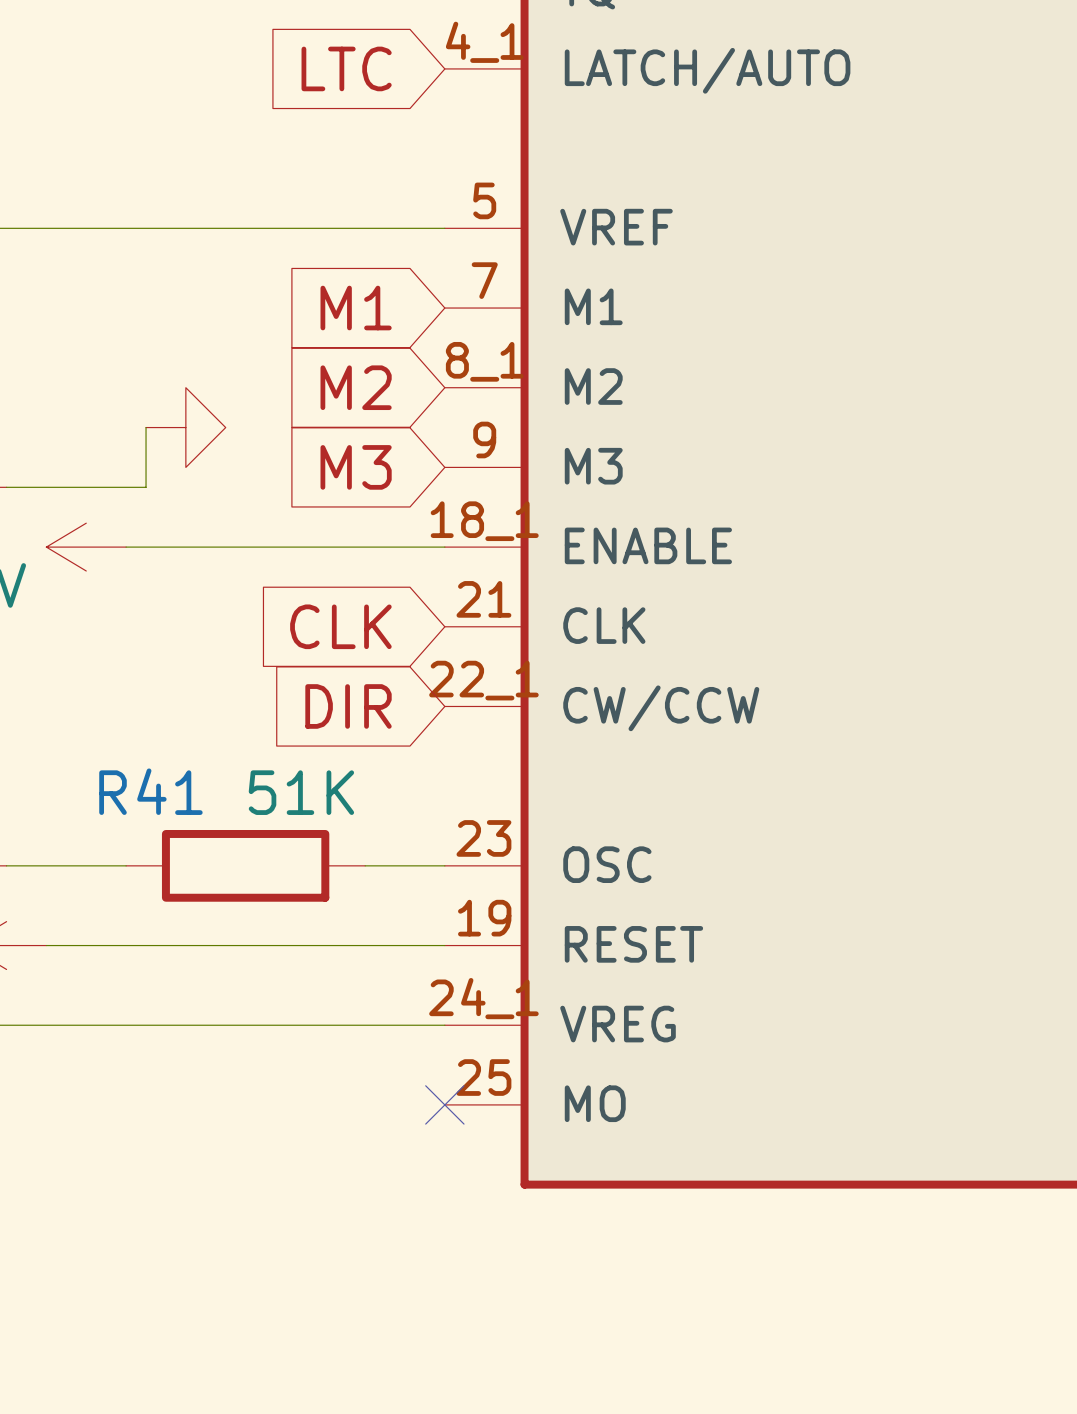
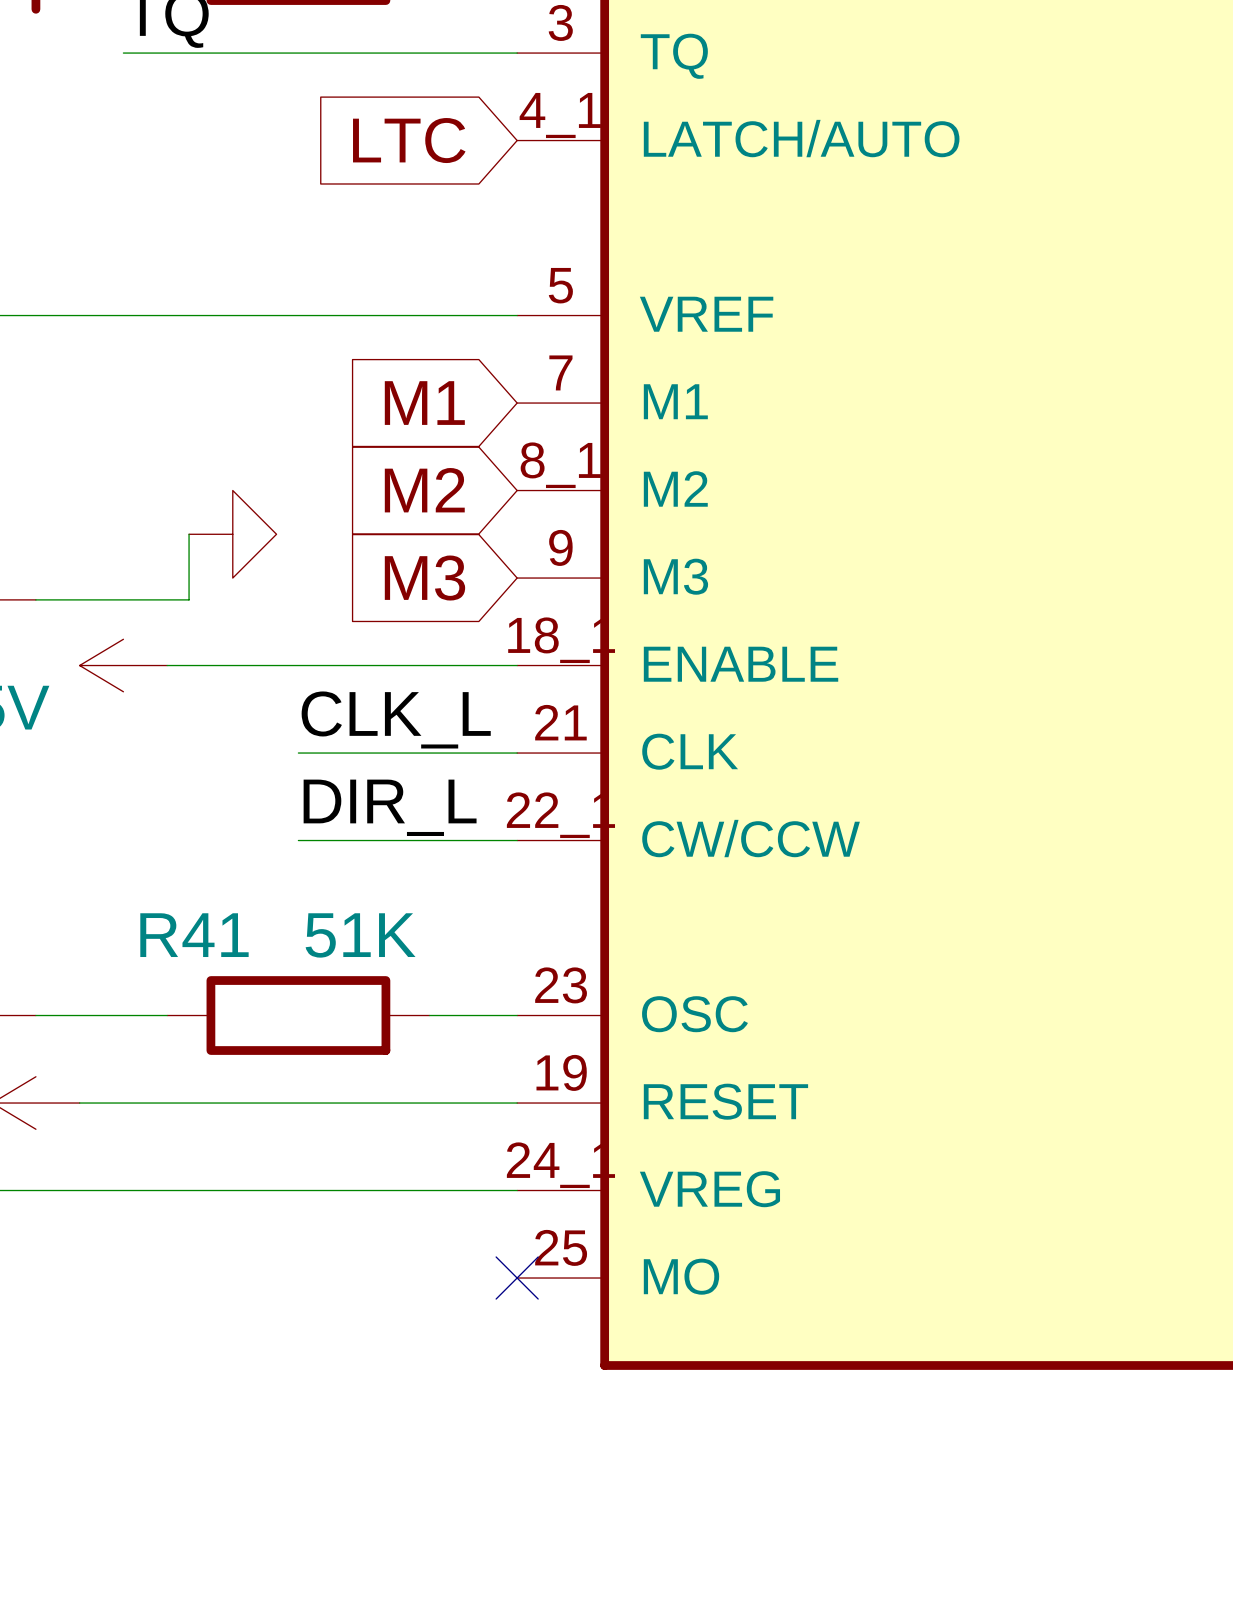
label: none -> CLK_L (396, 719)
wire: none -> (298, 753) (517, 753)
global label: CLK (340, 626) -> none
label: none -> DIR_L (390, 807)
wire: none -> (298, 840) (517, 840)
global label: DIR (348, 706) -> none

